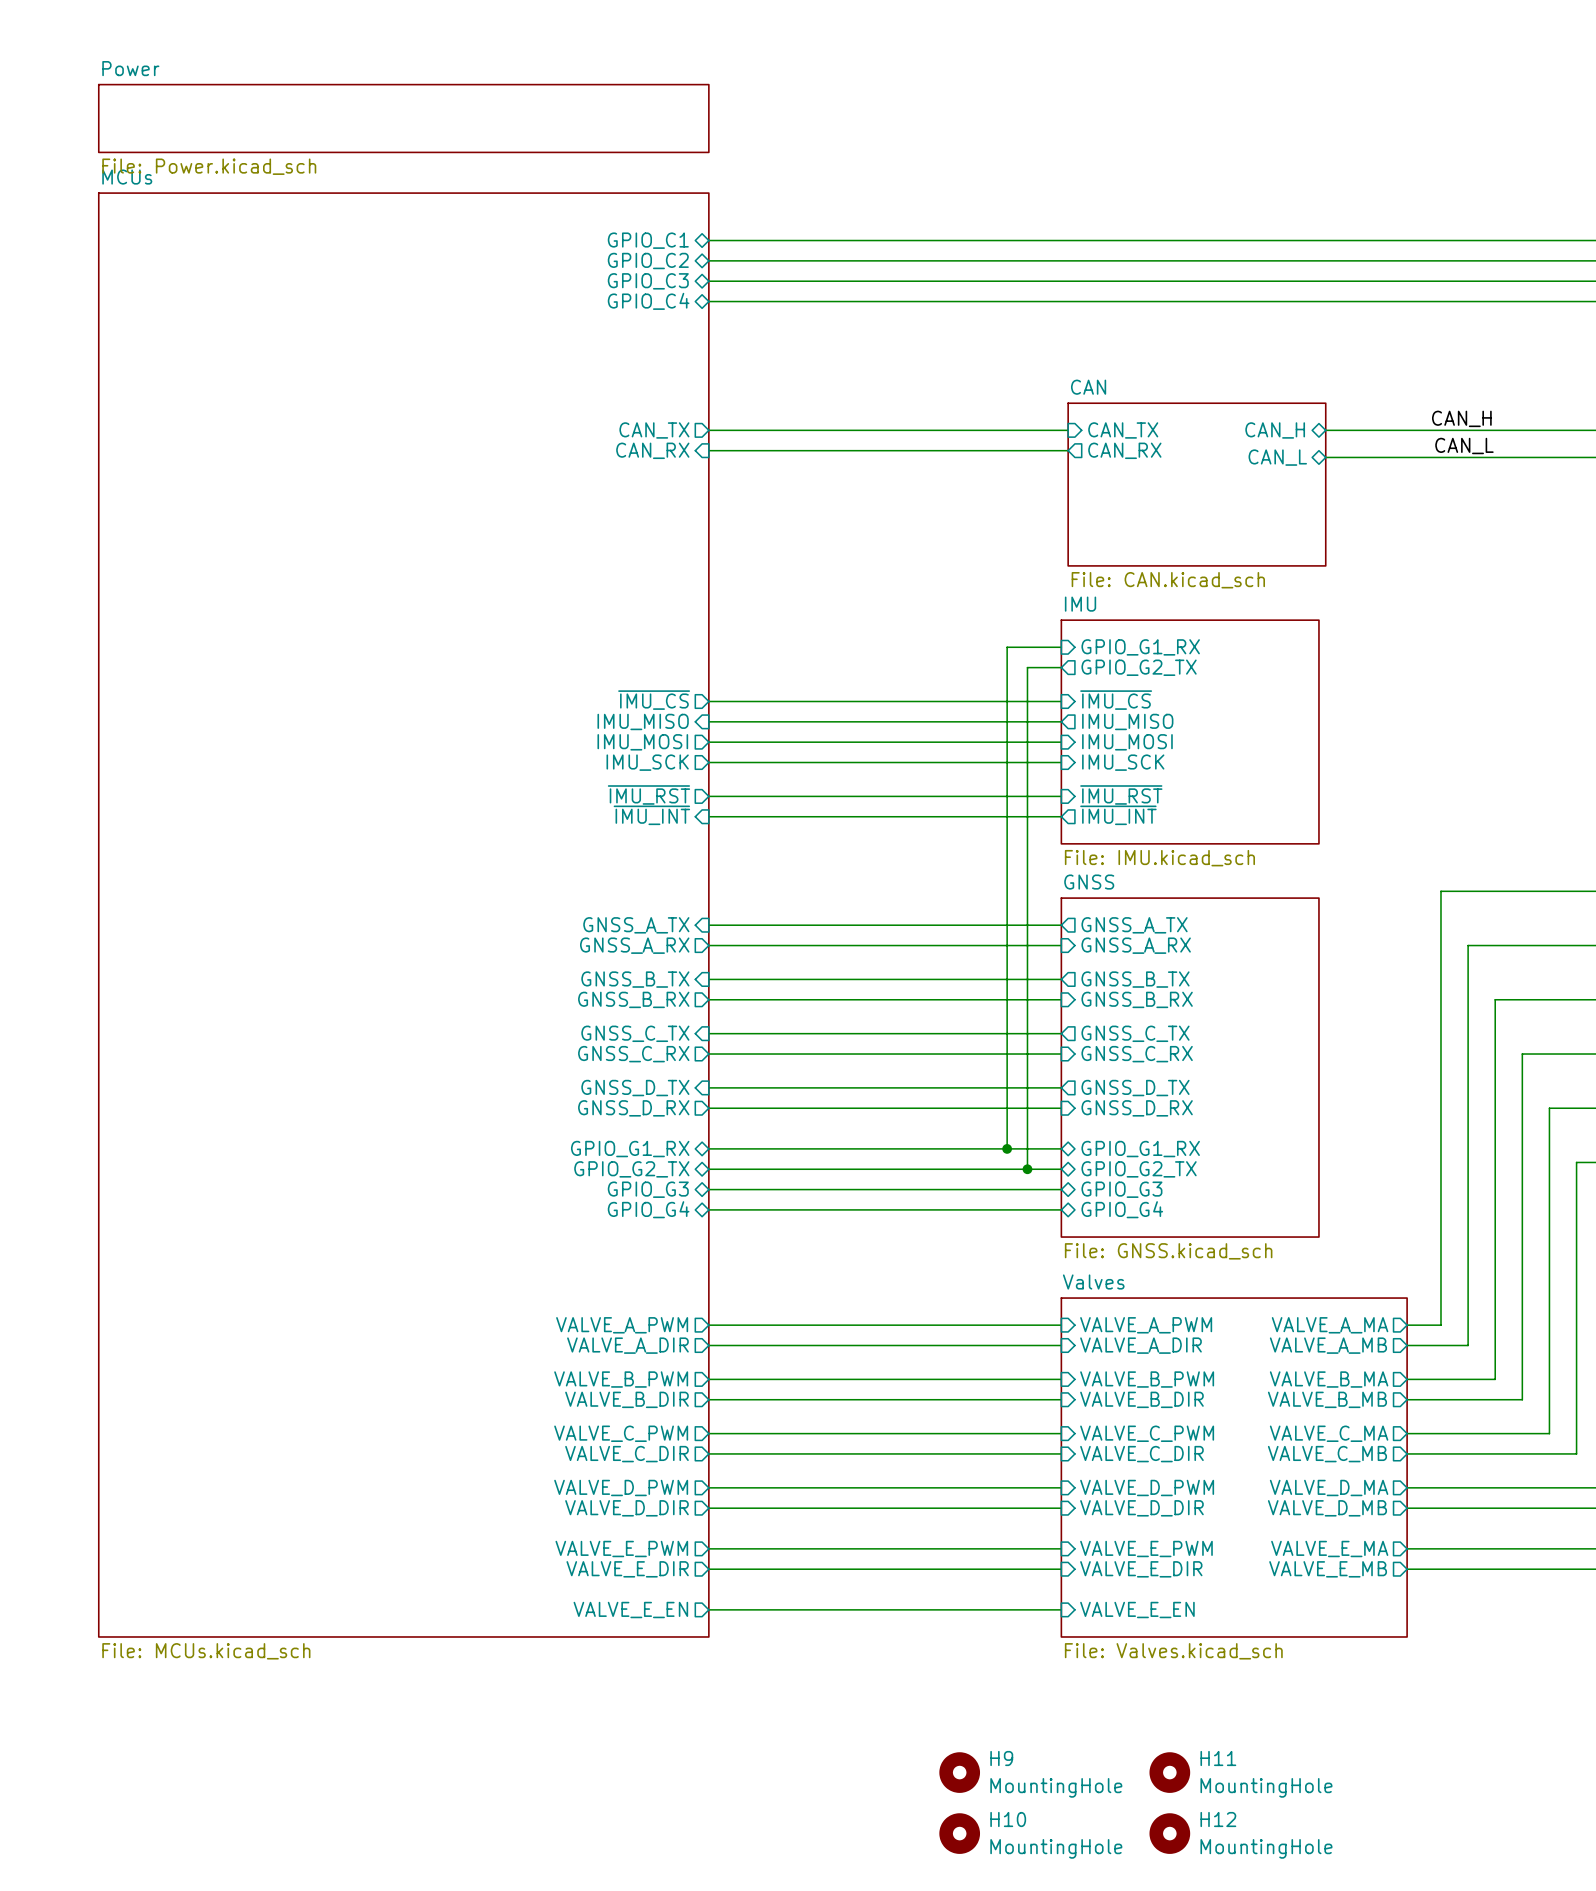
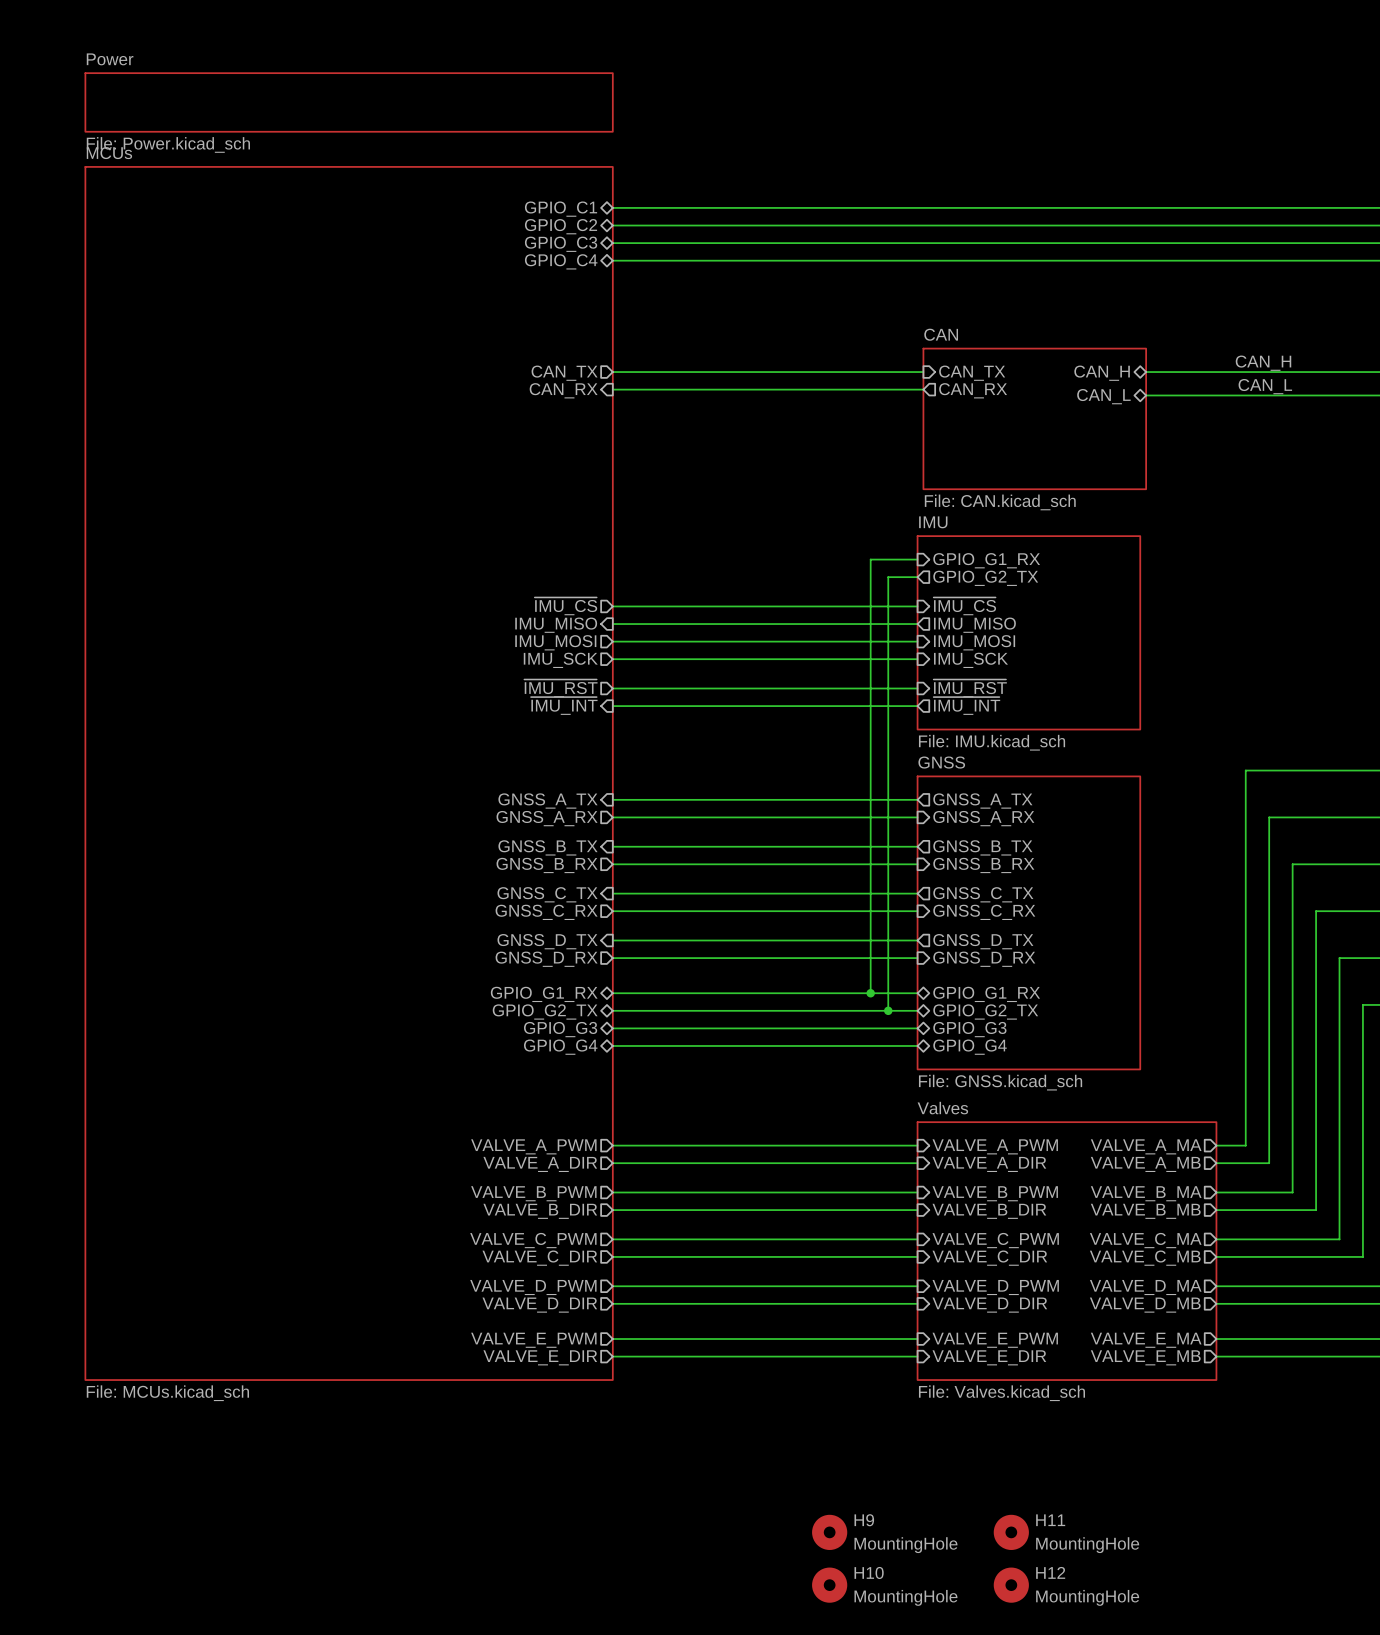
sheet MCUs: none -> File: MCUs.kicad_sch (349, 773)
sheet MCUs: File: MCUs.kicad_sch (403, 915) -> none
sheet Valves: none -> File: Valves.kicad_sch (1067, 1251)
sheet Valves: File: Valves.kicad_sch (1234, 1467) -> none
wire: (708, 1609) (1061, 1609) -> none
sheet pin: VALVE_E_EN (630, 1610) -> none
sheet pin: VALVE_E_EN (1137, 1610) -> none

